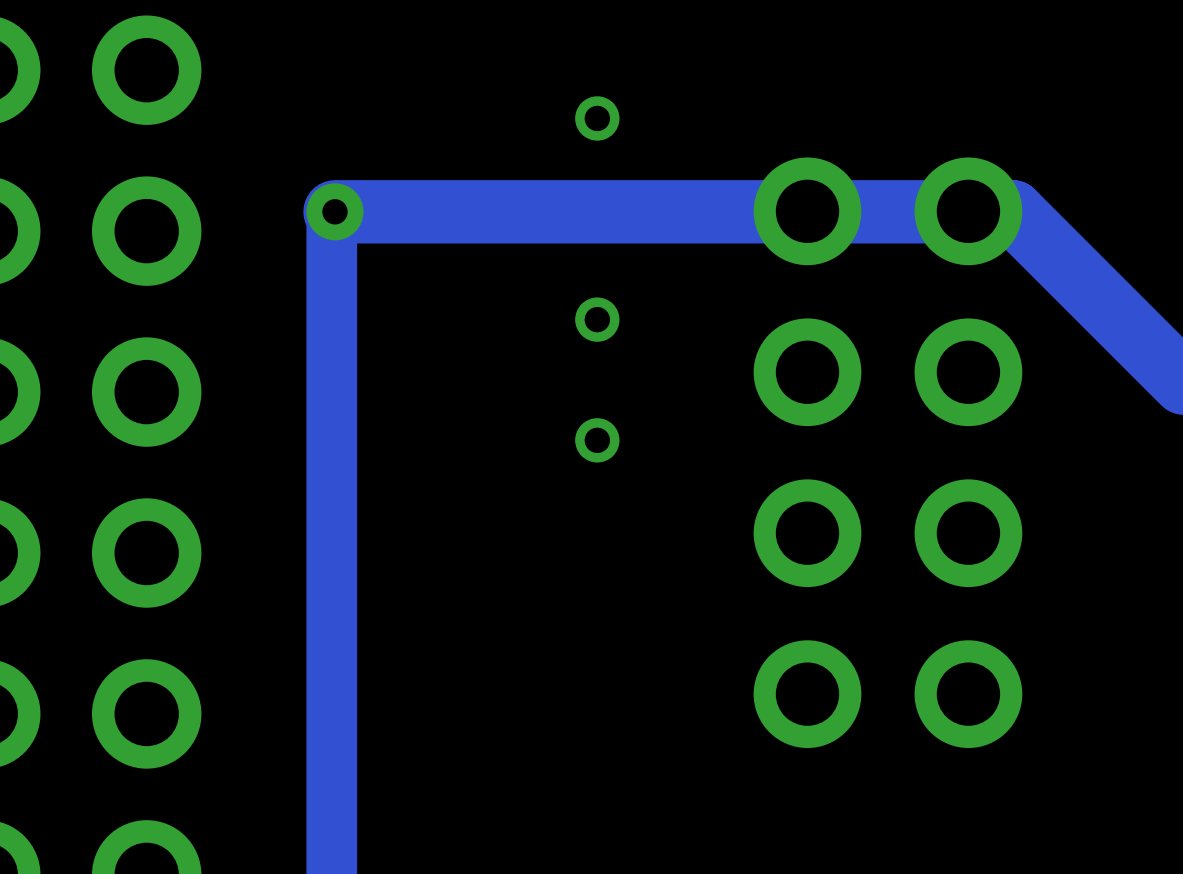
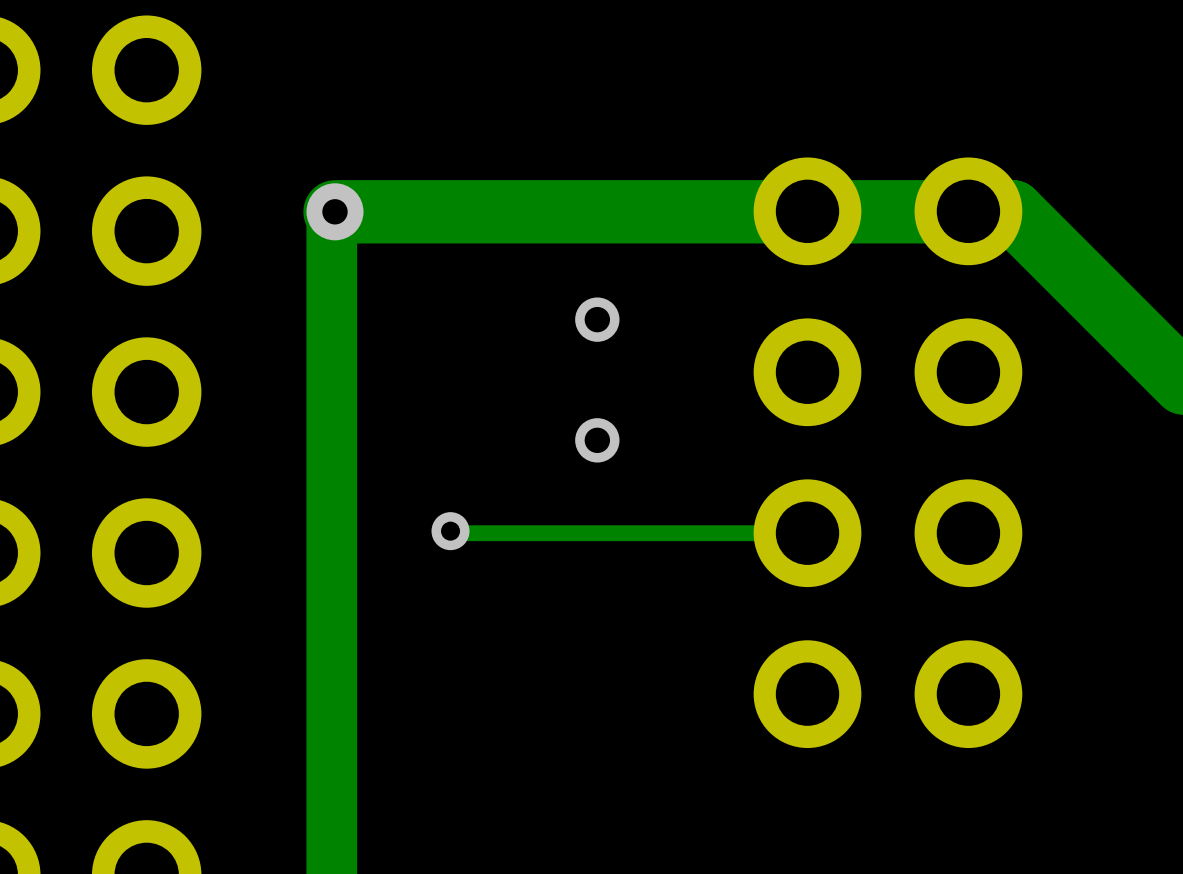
via: (597, 118) -> none
track: none -> (450, 531) (452, 533) (807, 533)
via: none -> (450, 531)

